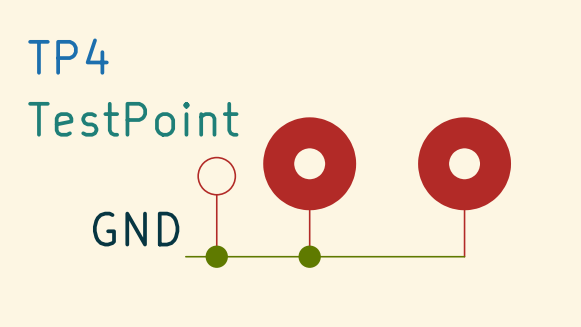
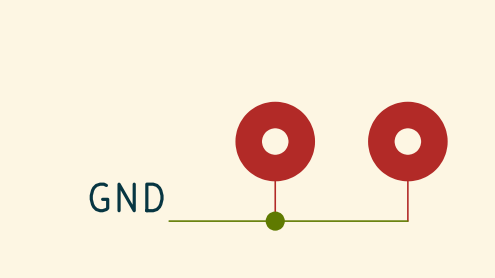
TP4: TestPoint (216, 207) -> none
junction: (216, 256) -> none

